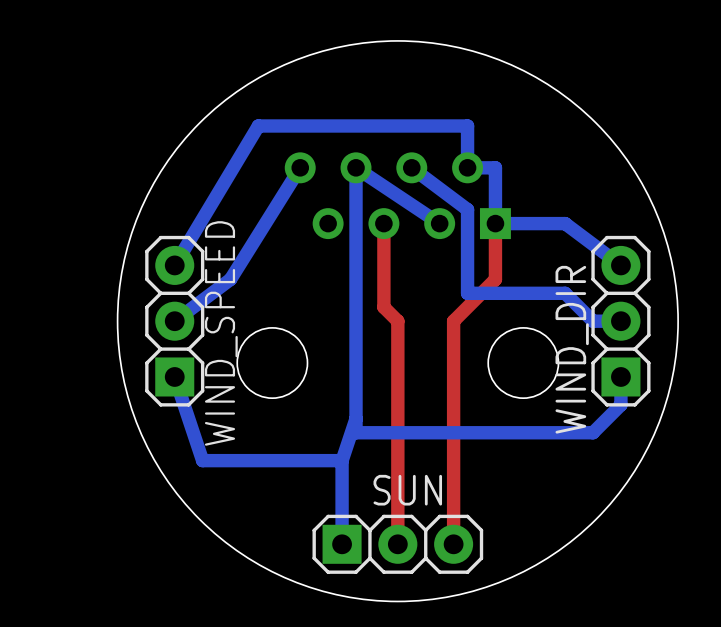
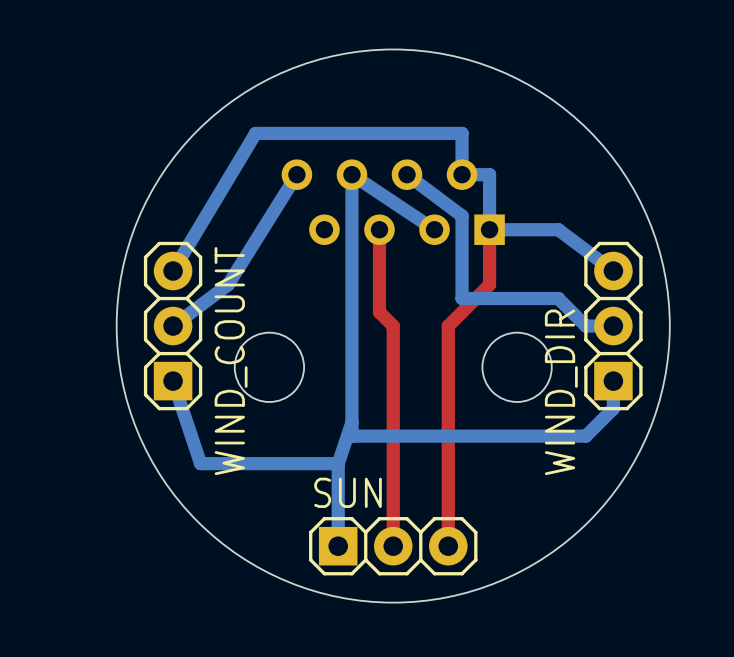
text: WIND_SPEED (221, 333) -> none
WIND_DIR name position: WIND_DIR (572, 349) -> WIND_DIR (561, 392)
WIND_COUNT name: none -> WIND_COUNT (231, 361)
SUN name position: SUN (407, 490) -> SUN (348, 492)

